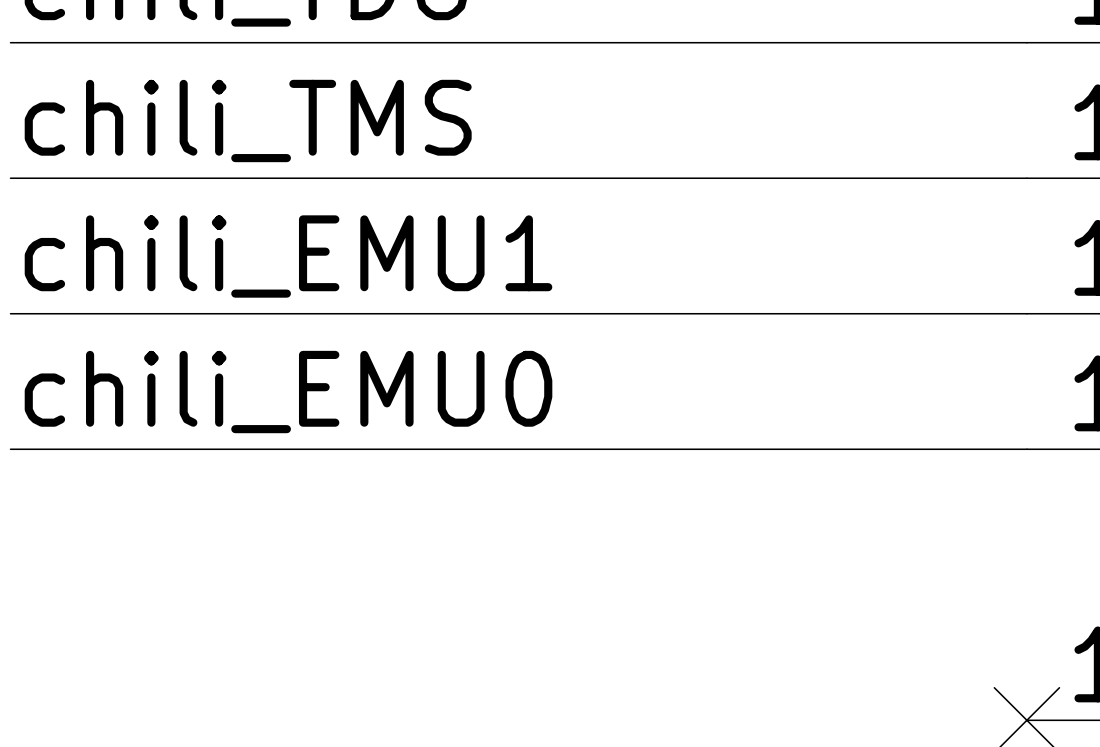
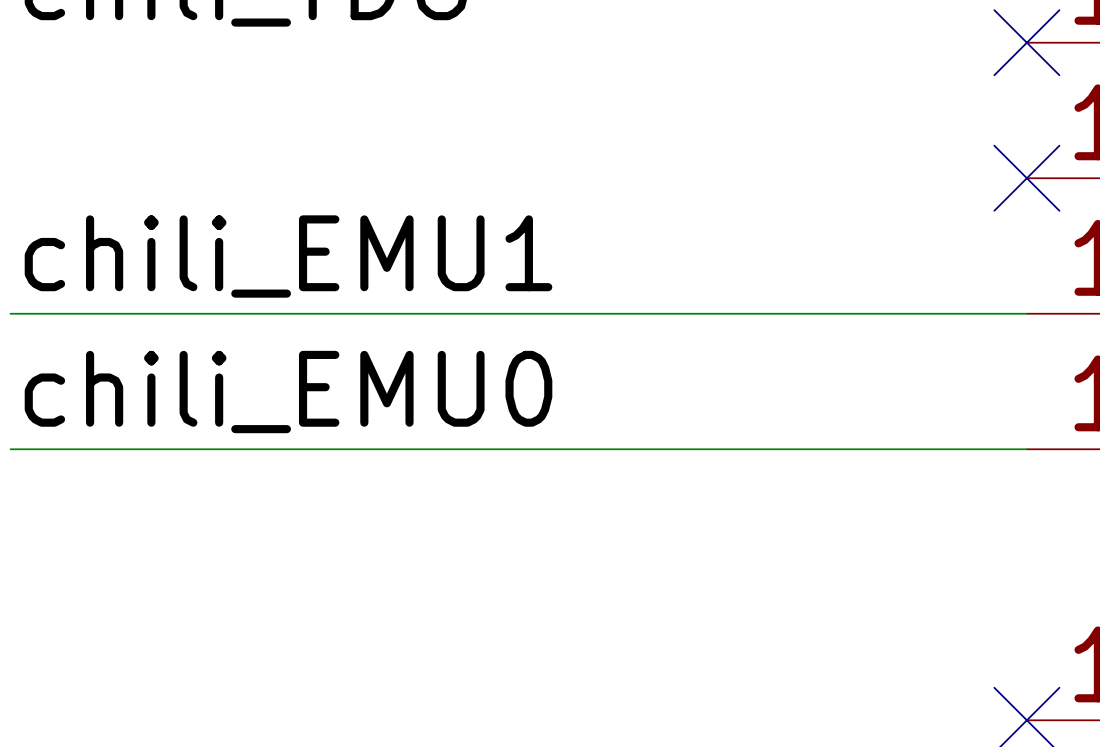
wire: (10, 42) (1026, 42) -> none
no-connect mark: none -> (1026, 42)
label: chili_TMS (248, 120) -> none
wire: (10, 178) (1026, 178) -> none
no-connect mark: none -> (1026, 178)

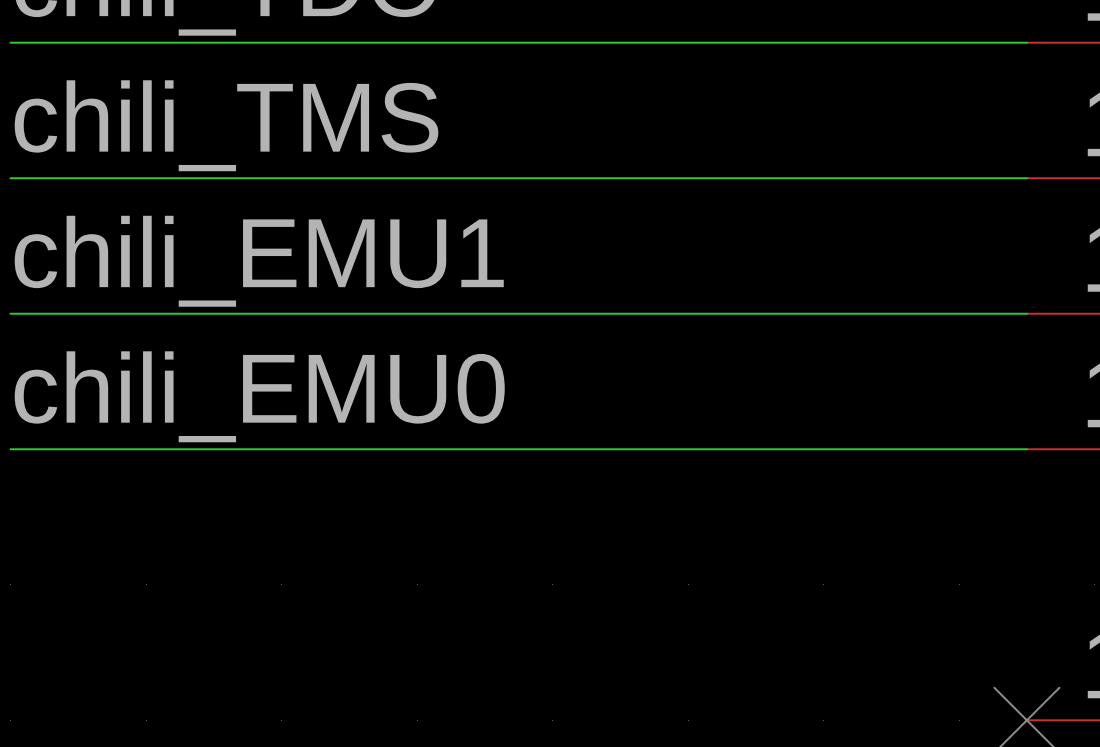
wire: none -> (10, 42) (1026, 42)
no-connect mark: (1026, 42) -> none
label: none -> chili_TMS (226, 125)
wire: none -> (10, 178) (1026, 178)
no-connect mark: (1026, 178) -> none

